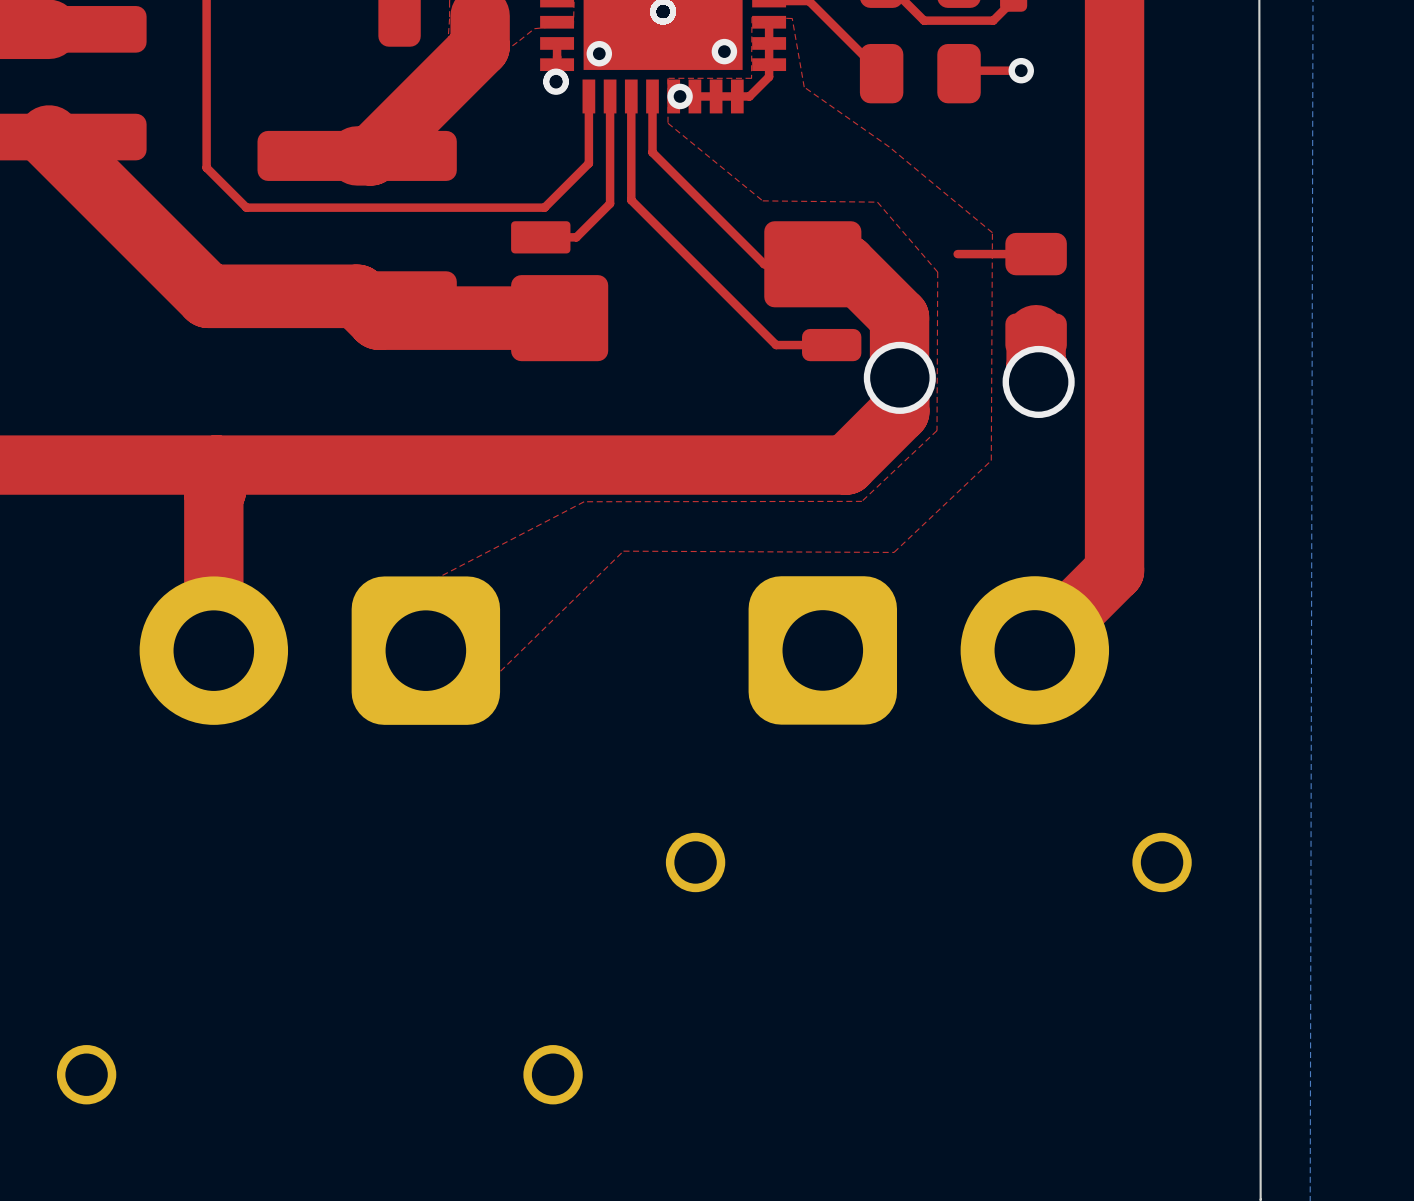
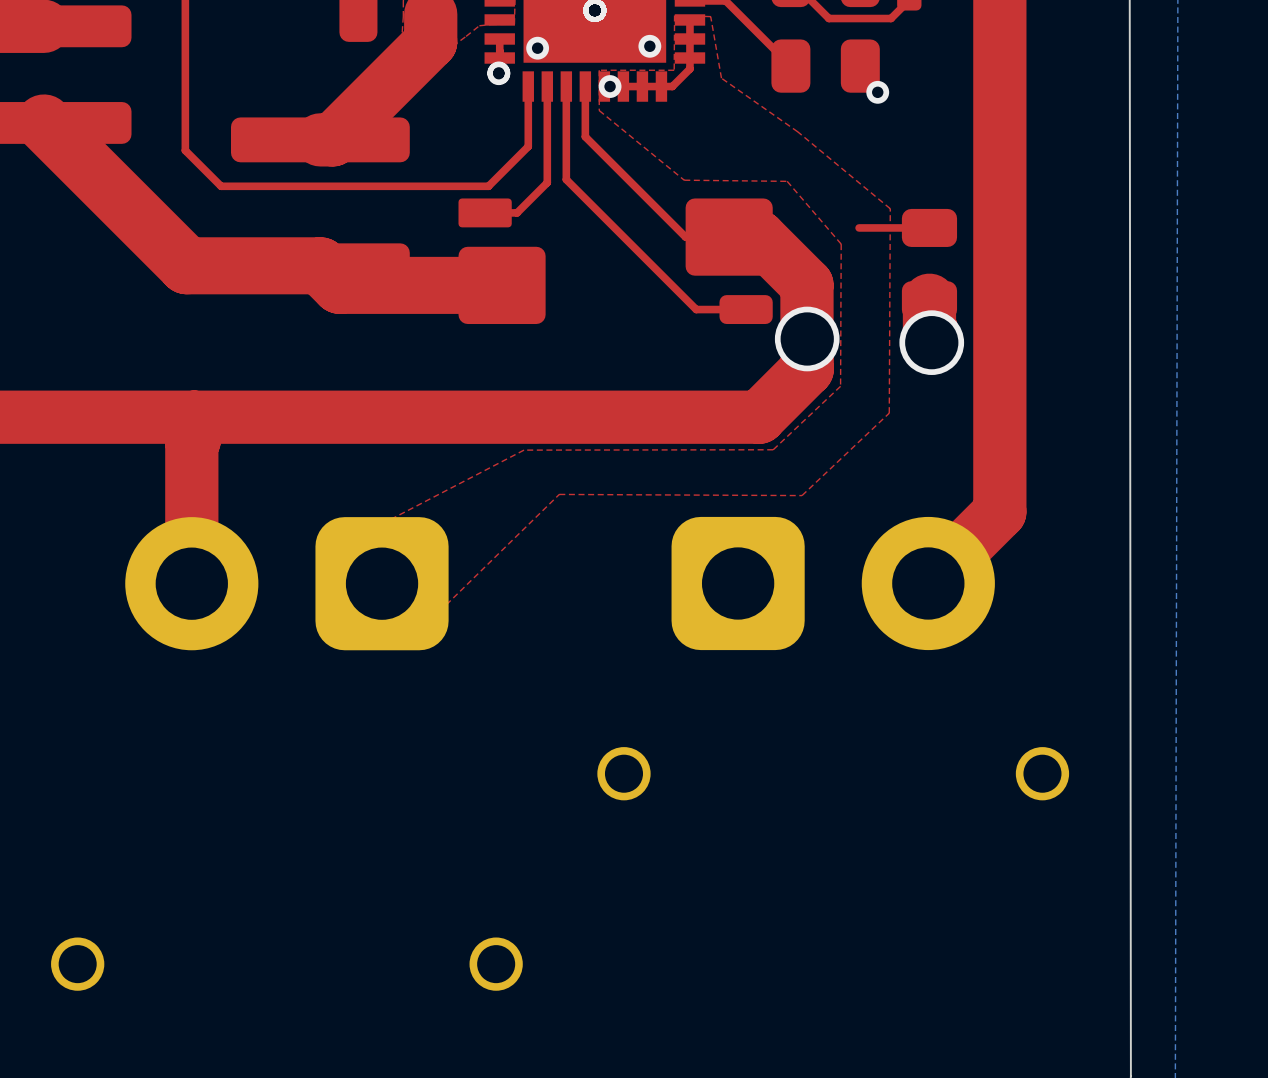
top track: (1021, 70) (961, 70) (959, 73) -> none
via position: (1021, 70) -> (877, 92)

